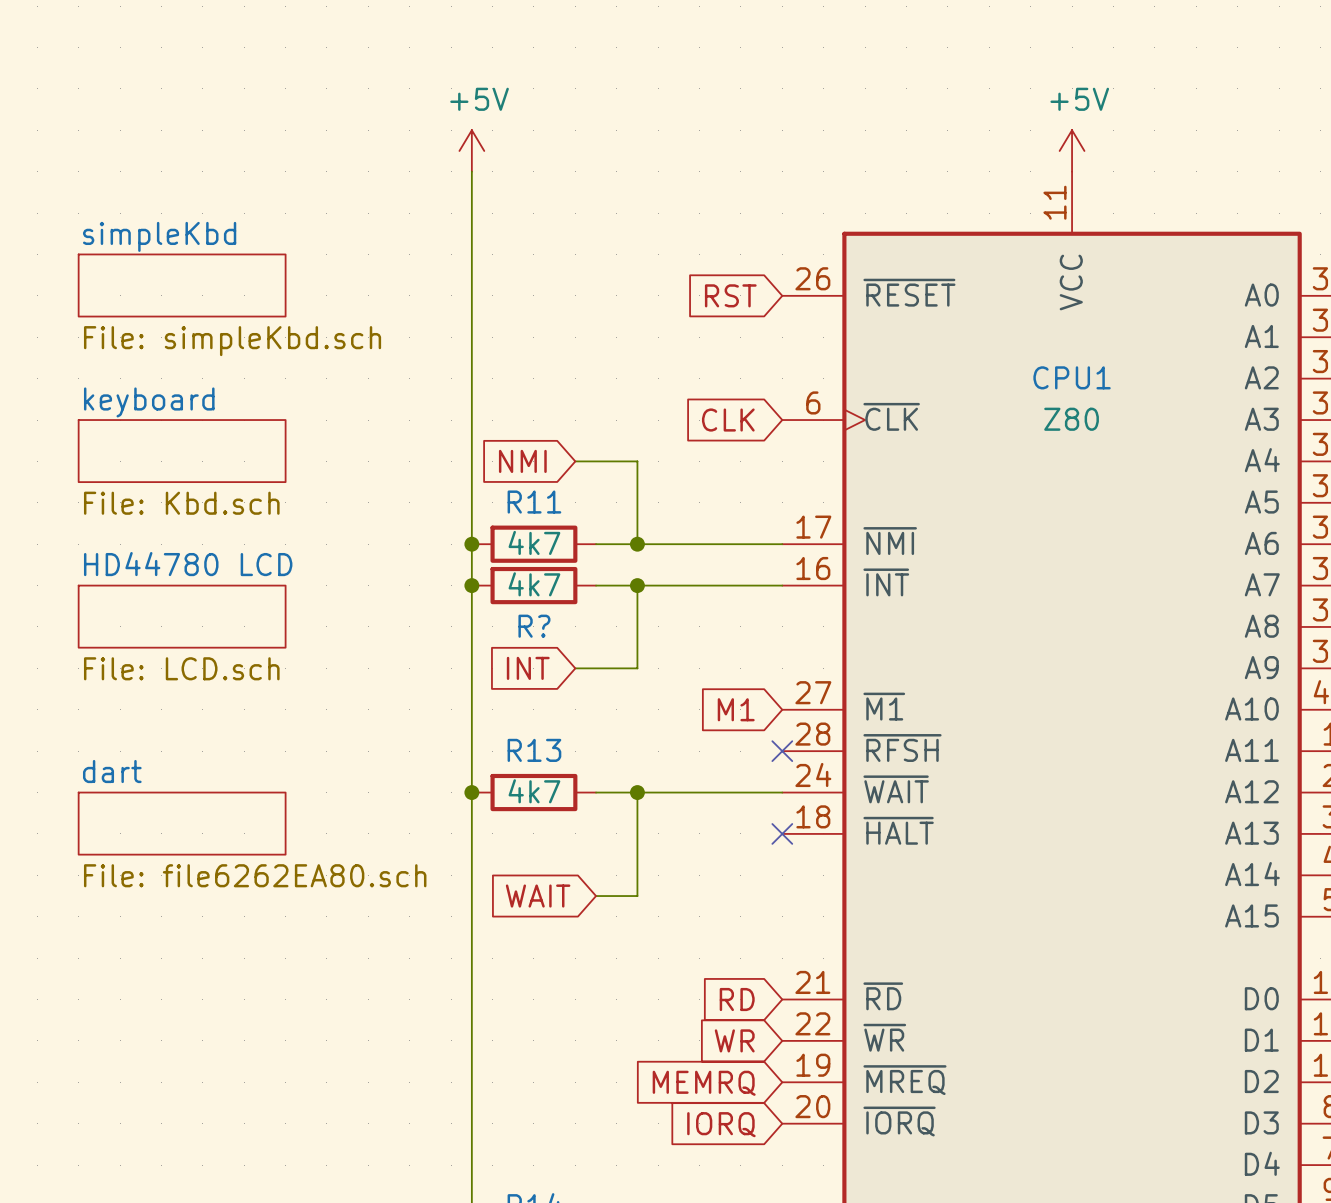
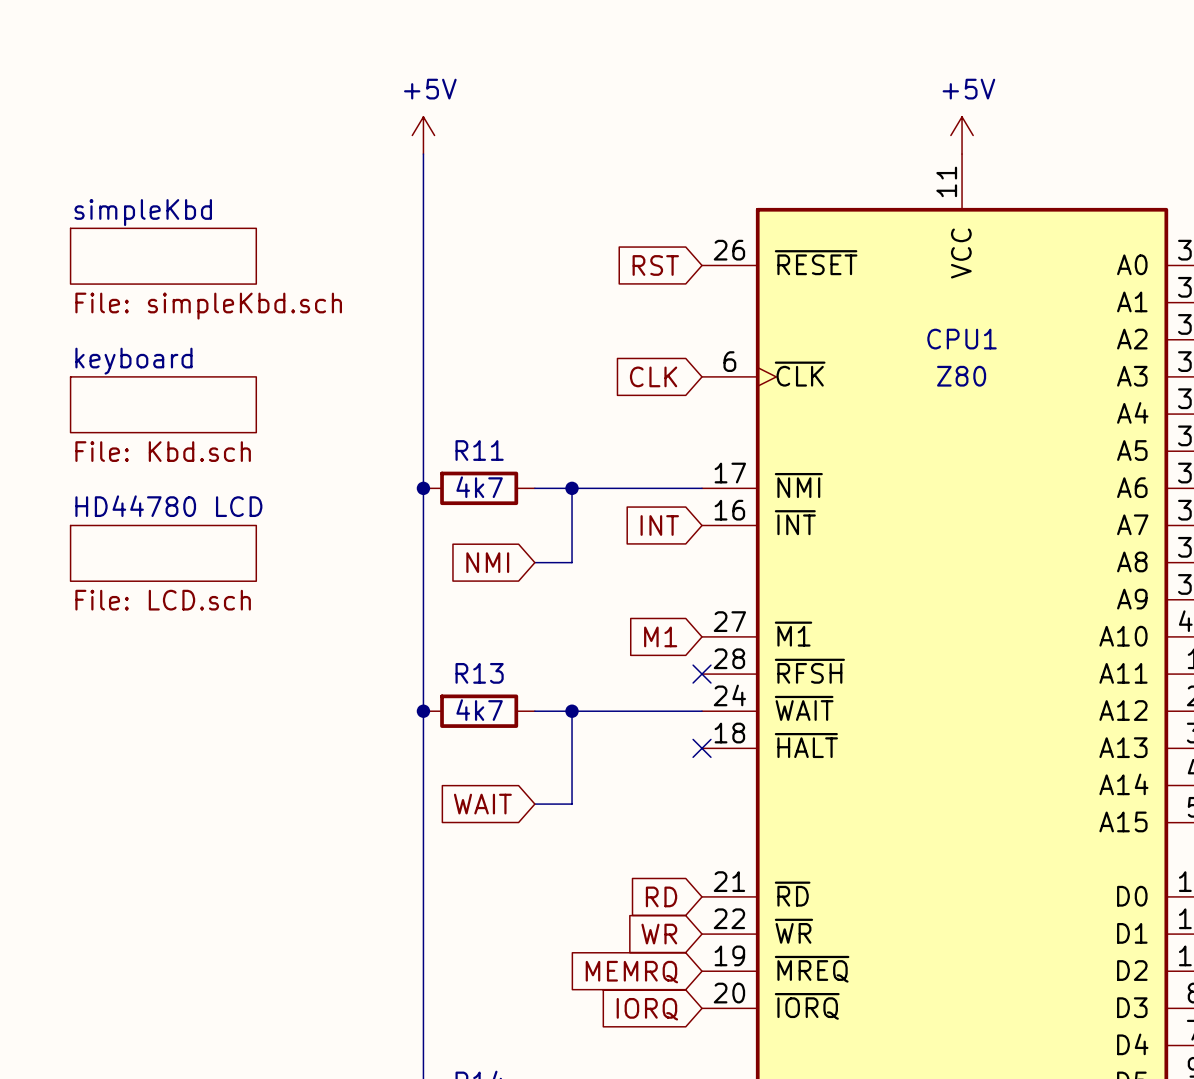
global label position: NMI (522, 461) -> NMI (487, 562)
wire: (575, 461) (637, 461) (637, 544) -> (572, 525) (572, 488)
junction: (471, 585) -> none
R?: 4k7 (533, 585) -> none
wire: (596, 585) (782, 585) -> none
junction: (637, 585) -> none
wire: (637, 626) (637, 668) (575, 668) -> (572, 562) (534, 562)
global label position: INT (528, 668) -> INT (659, 525)
sheet dart: File: file6262EA80.sch (182, 823) -> none

